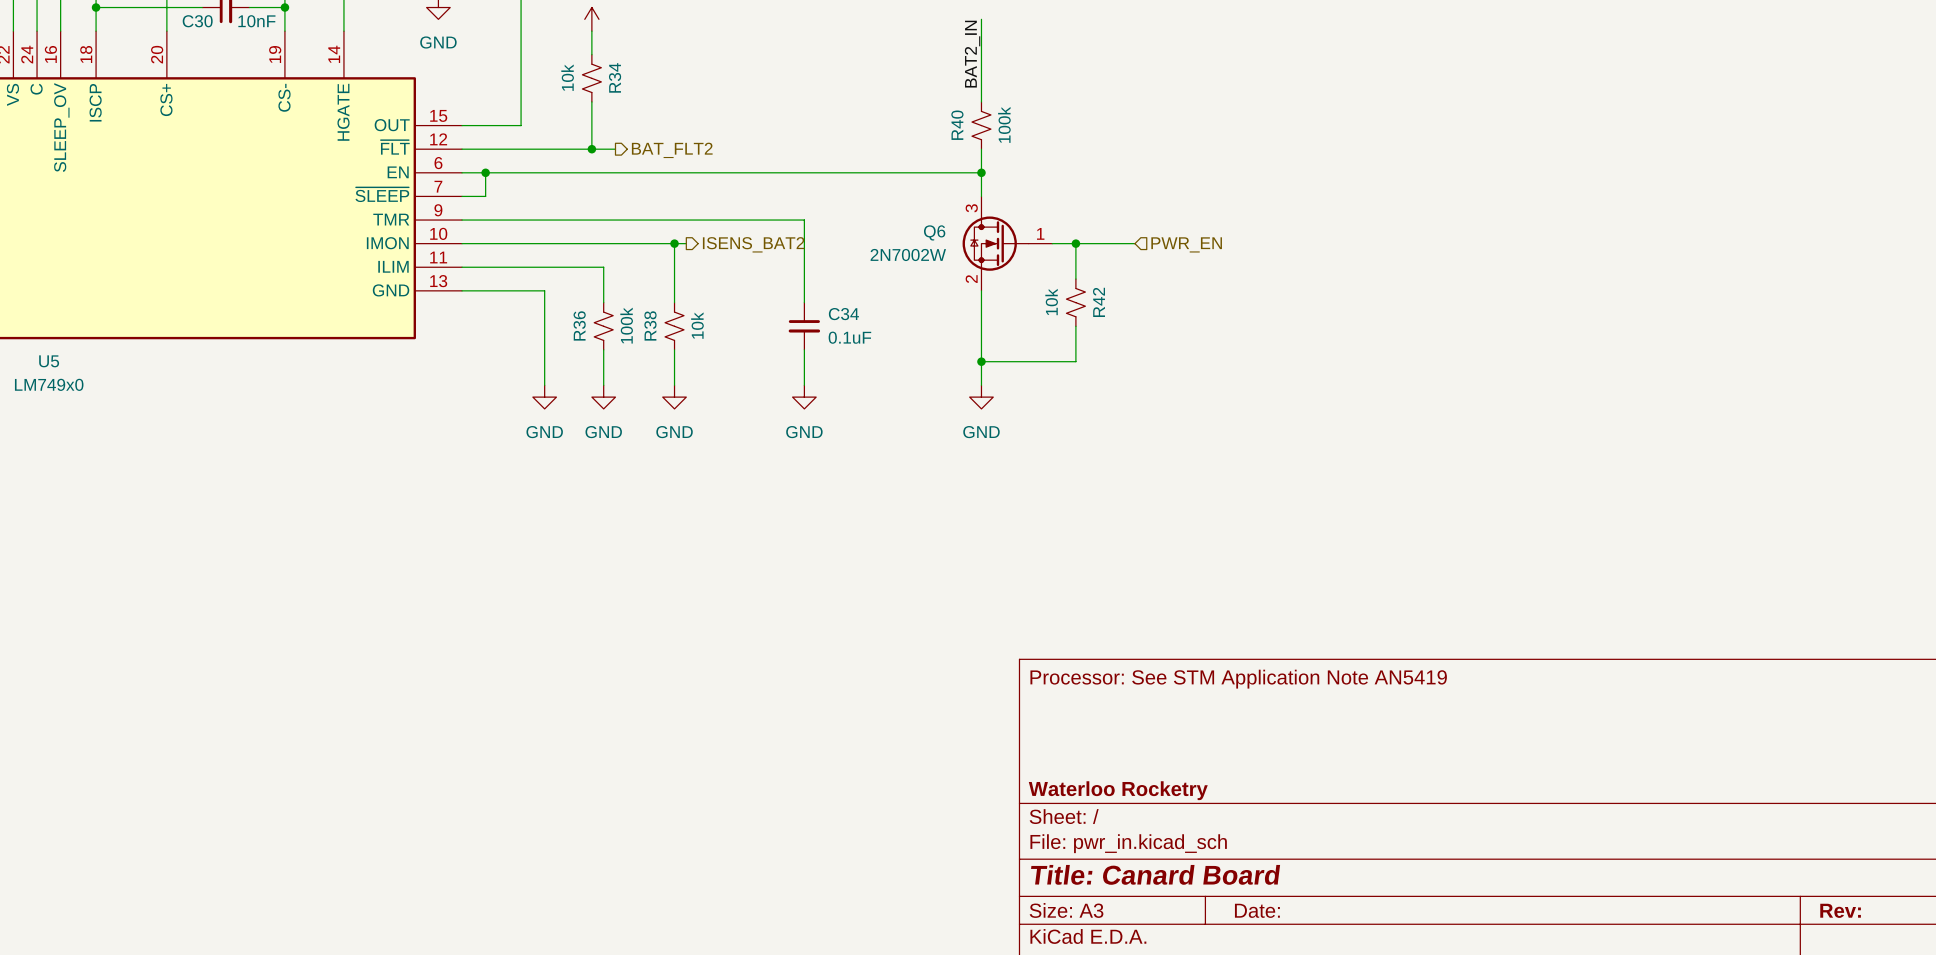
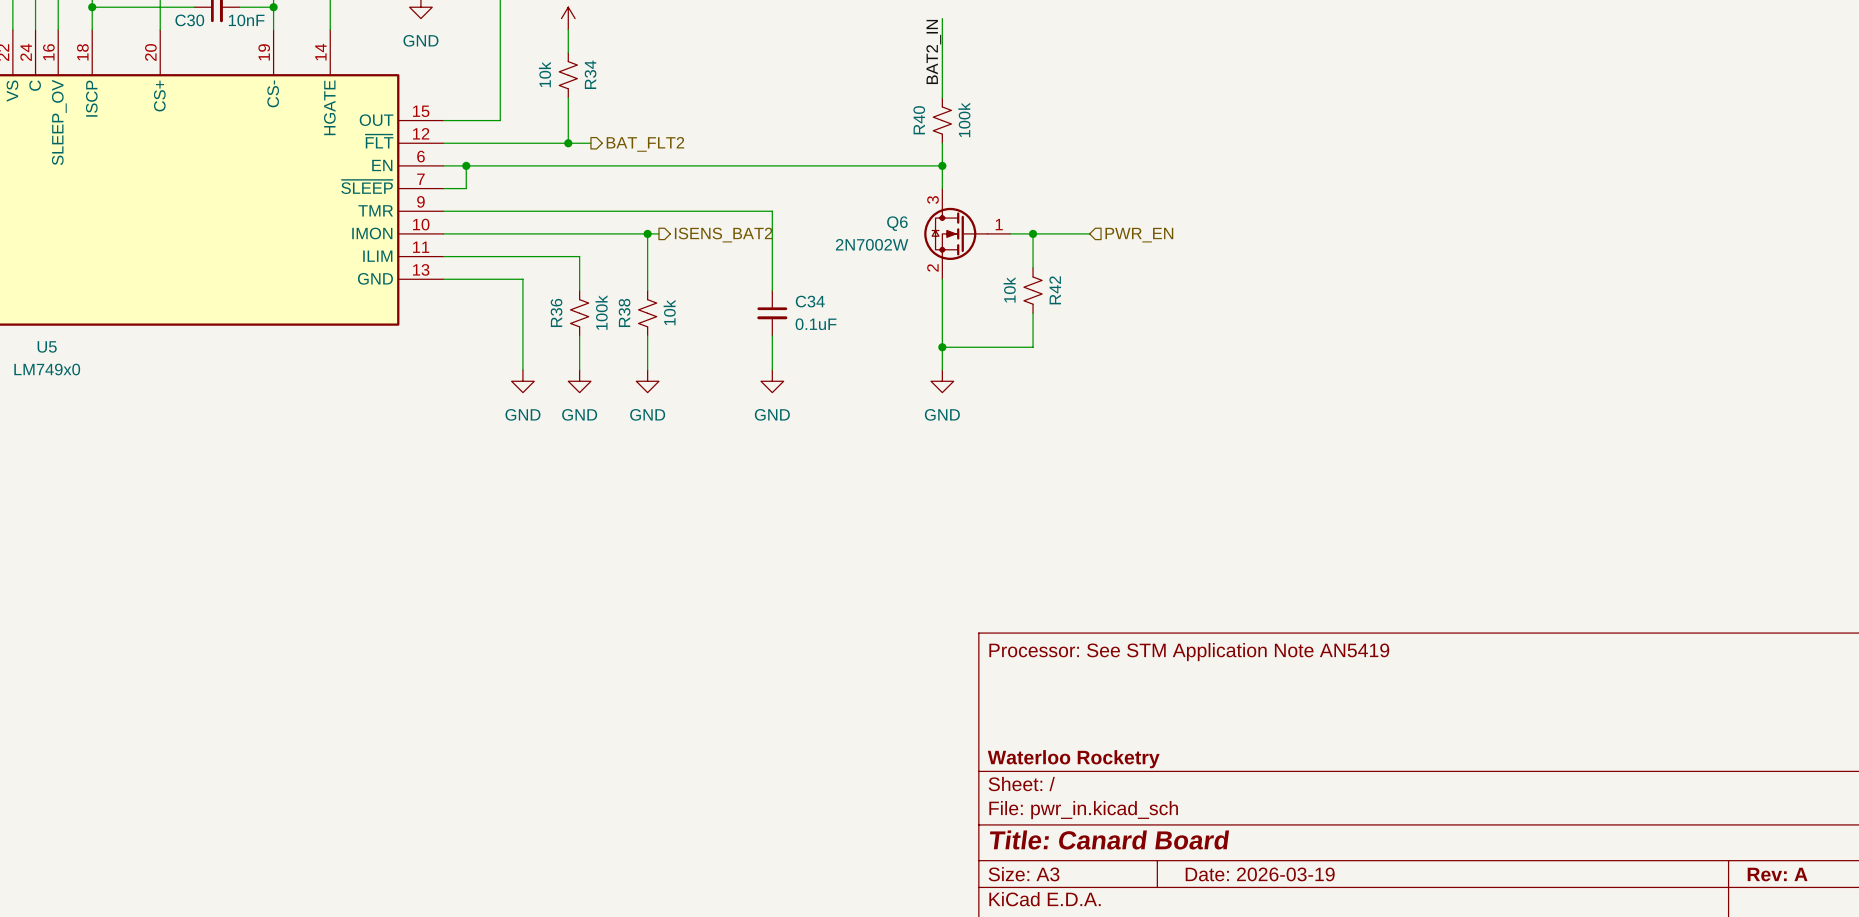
title block: Date: (1257, 910) -> Date: 2026-03-19 (1260, 874)
title block: Rev: (1840, 910) -> Rev: A (1777, 874)

